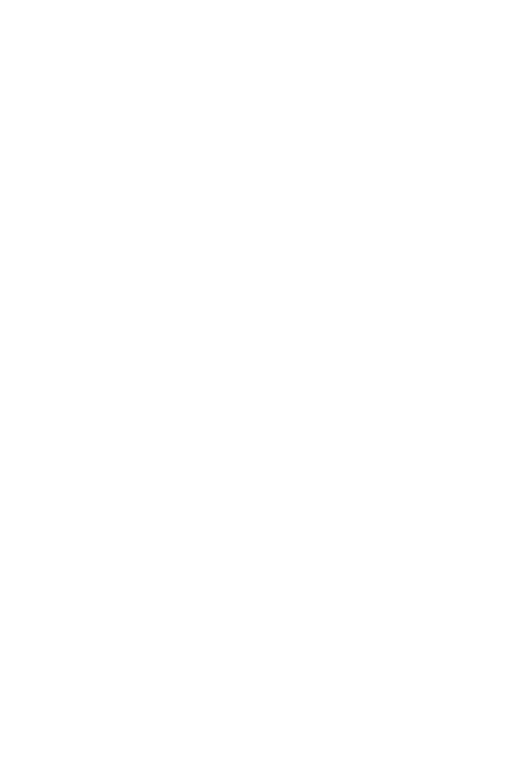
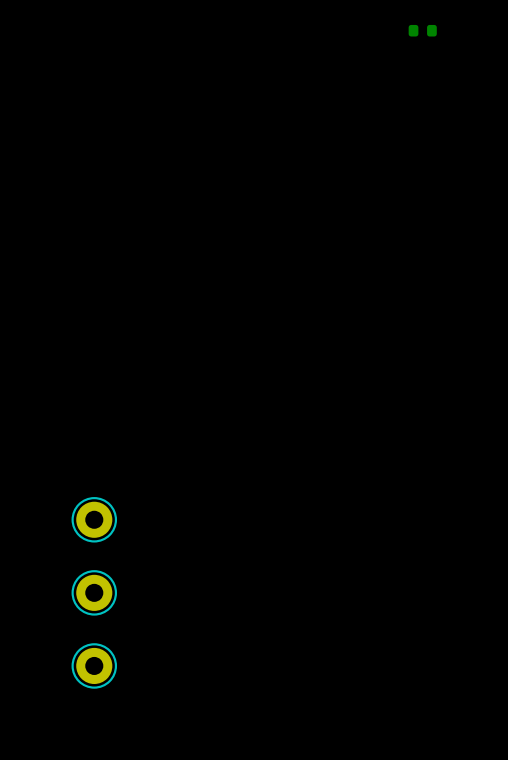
part: none -> (422, 30)
part: none -> (94, 519)
part: none -> (94, 592)
part: none -> (94, 665)

